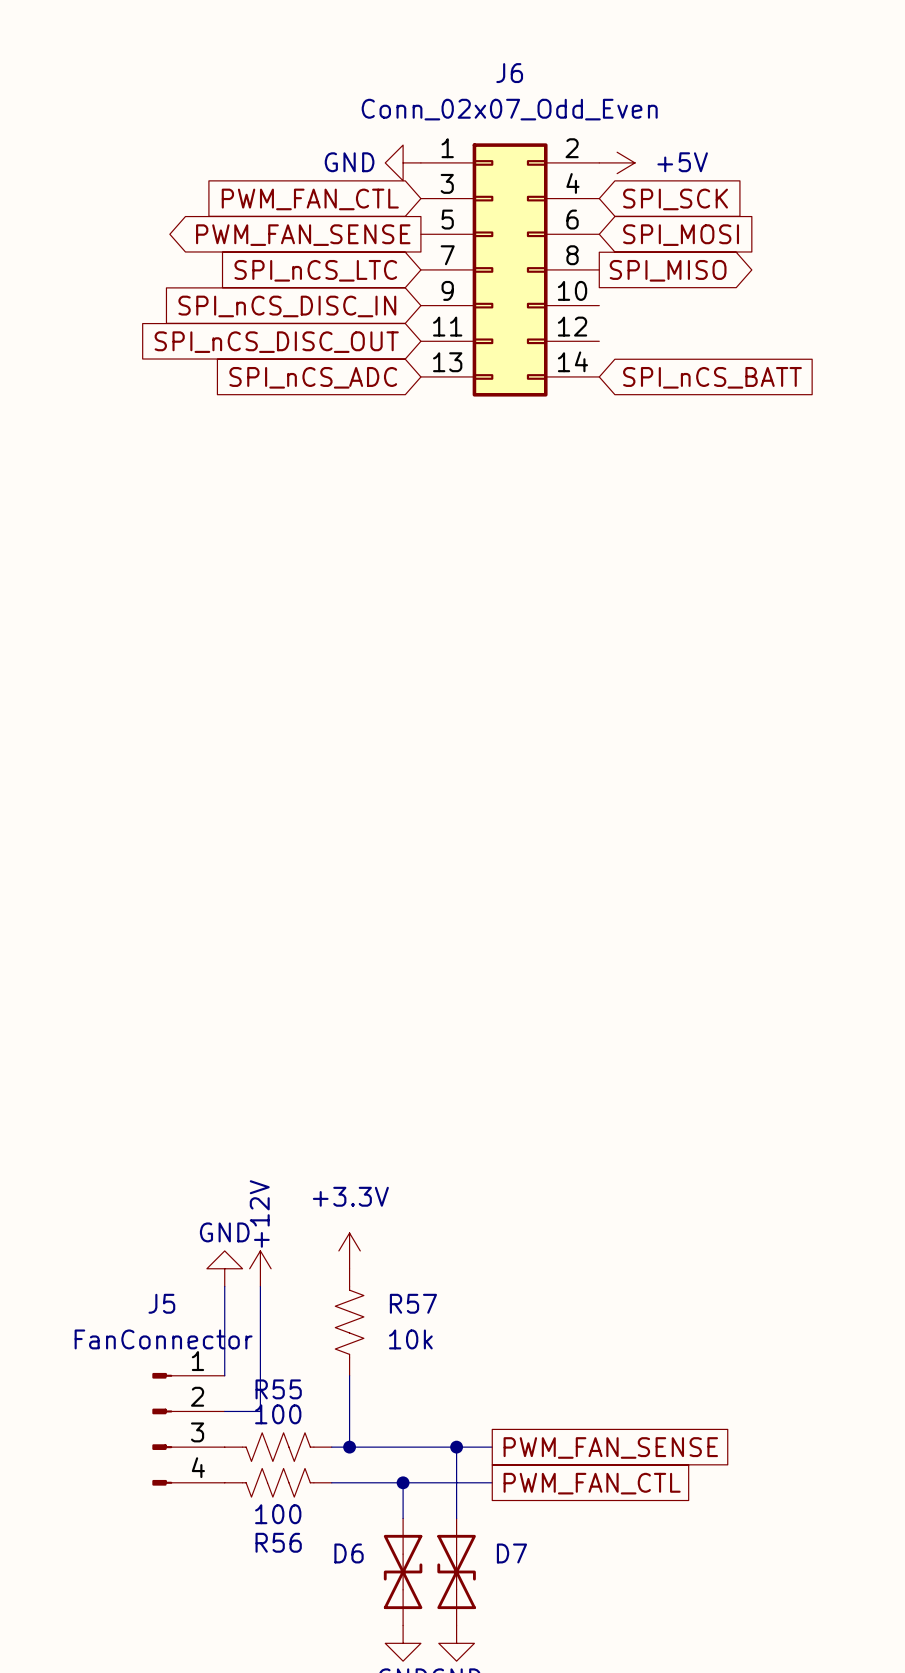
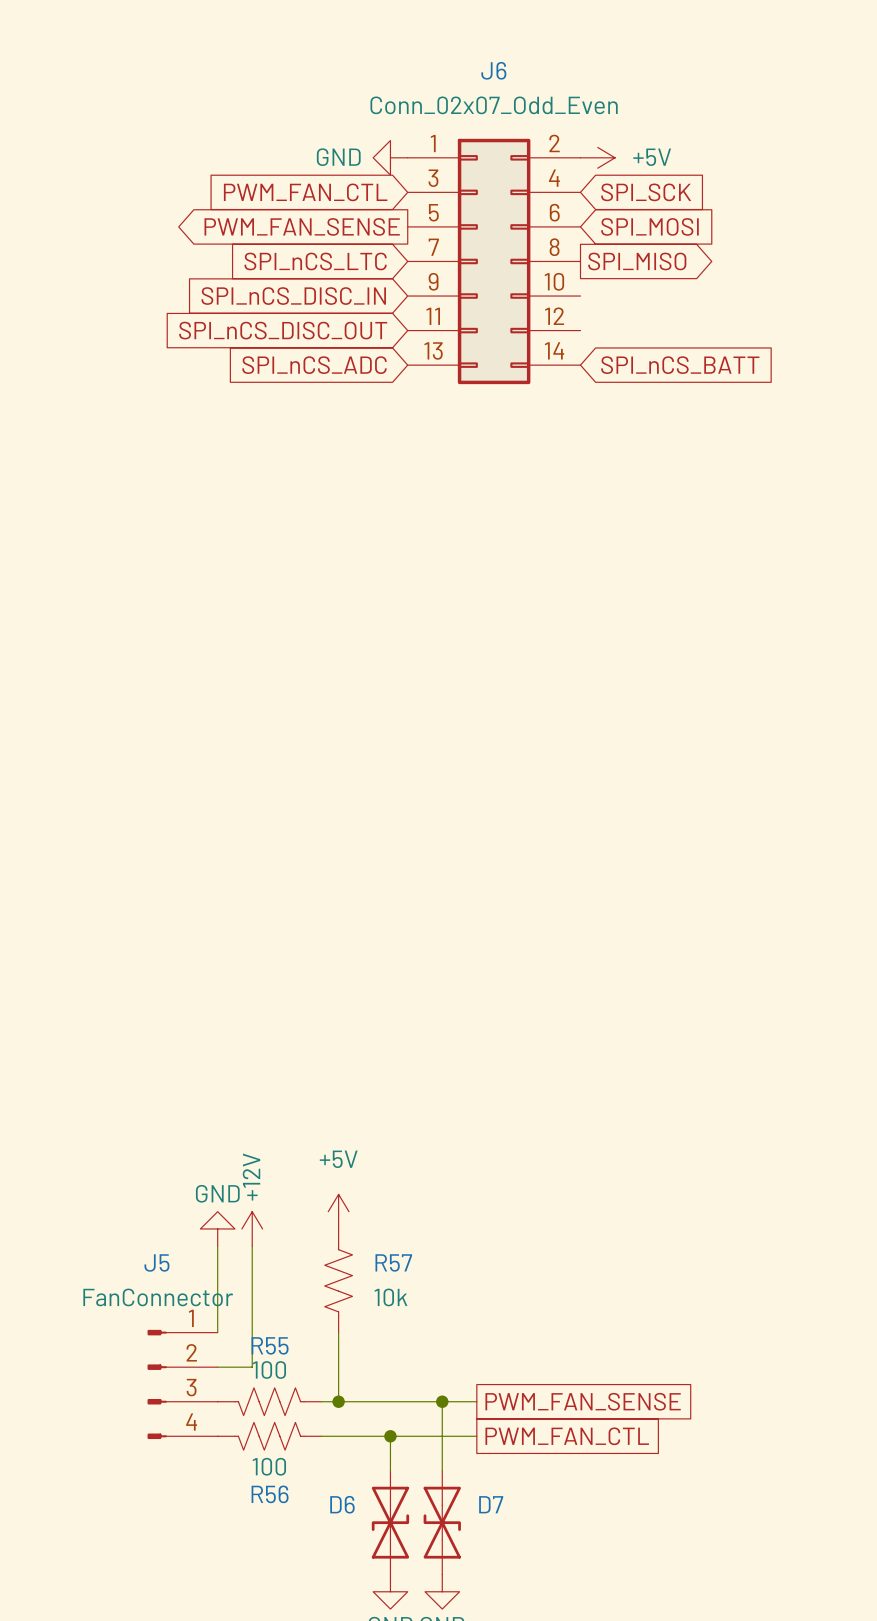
power symbol: +3.3V (349, 1250) -> +5V (338, 1211)

